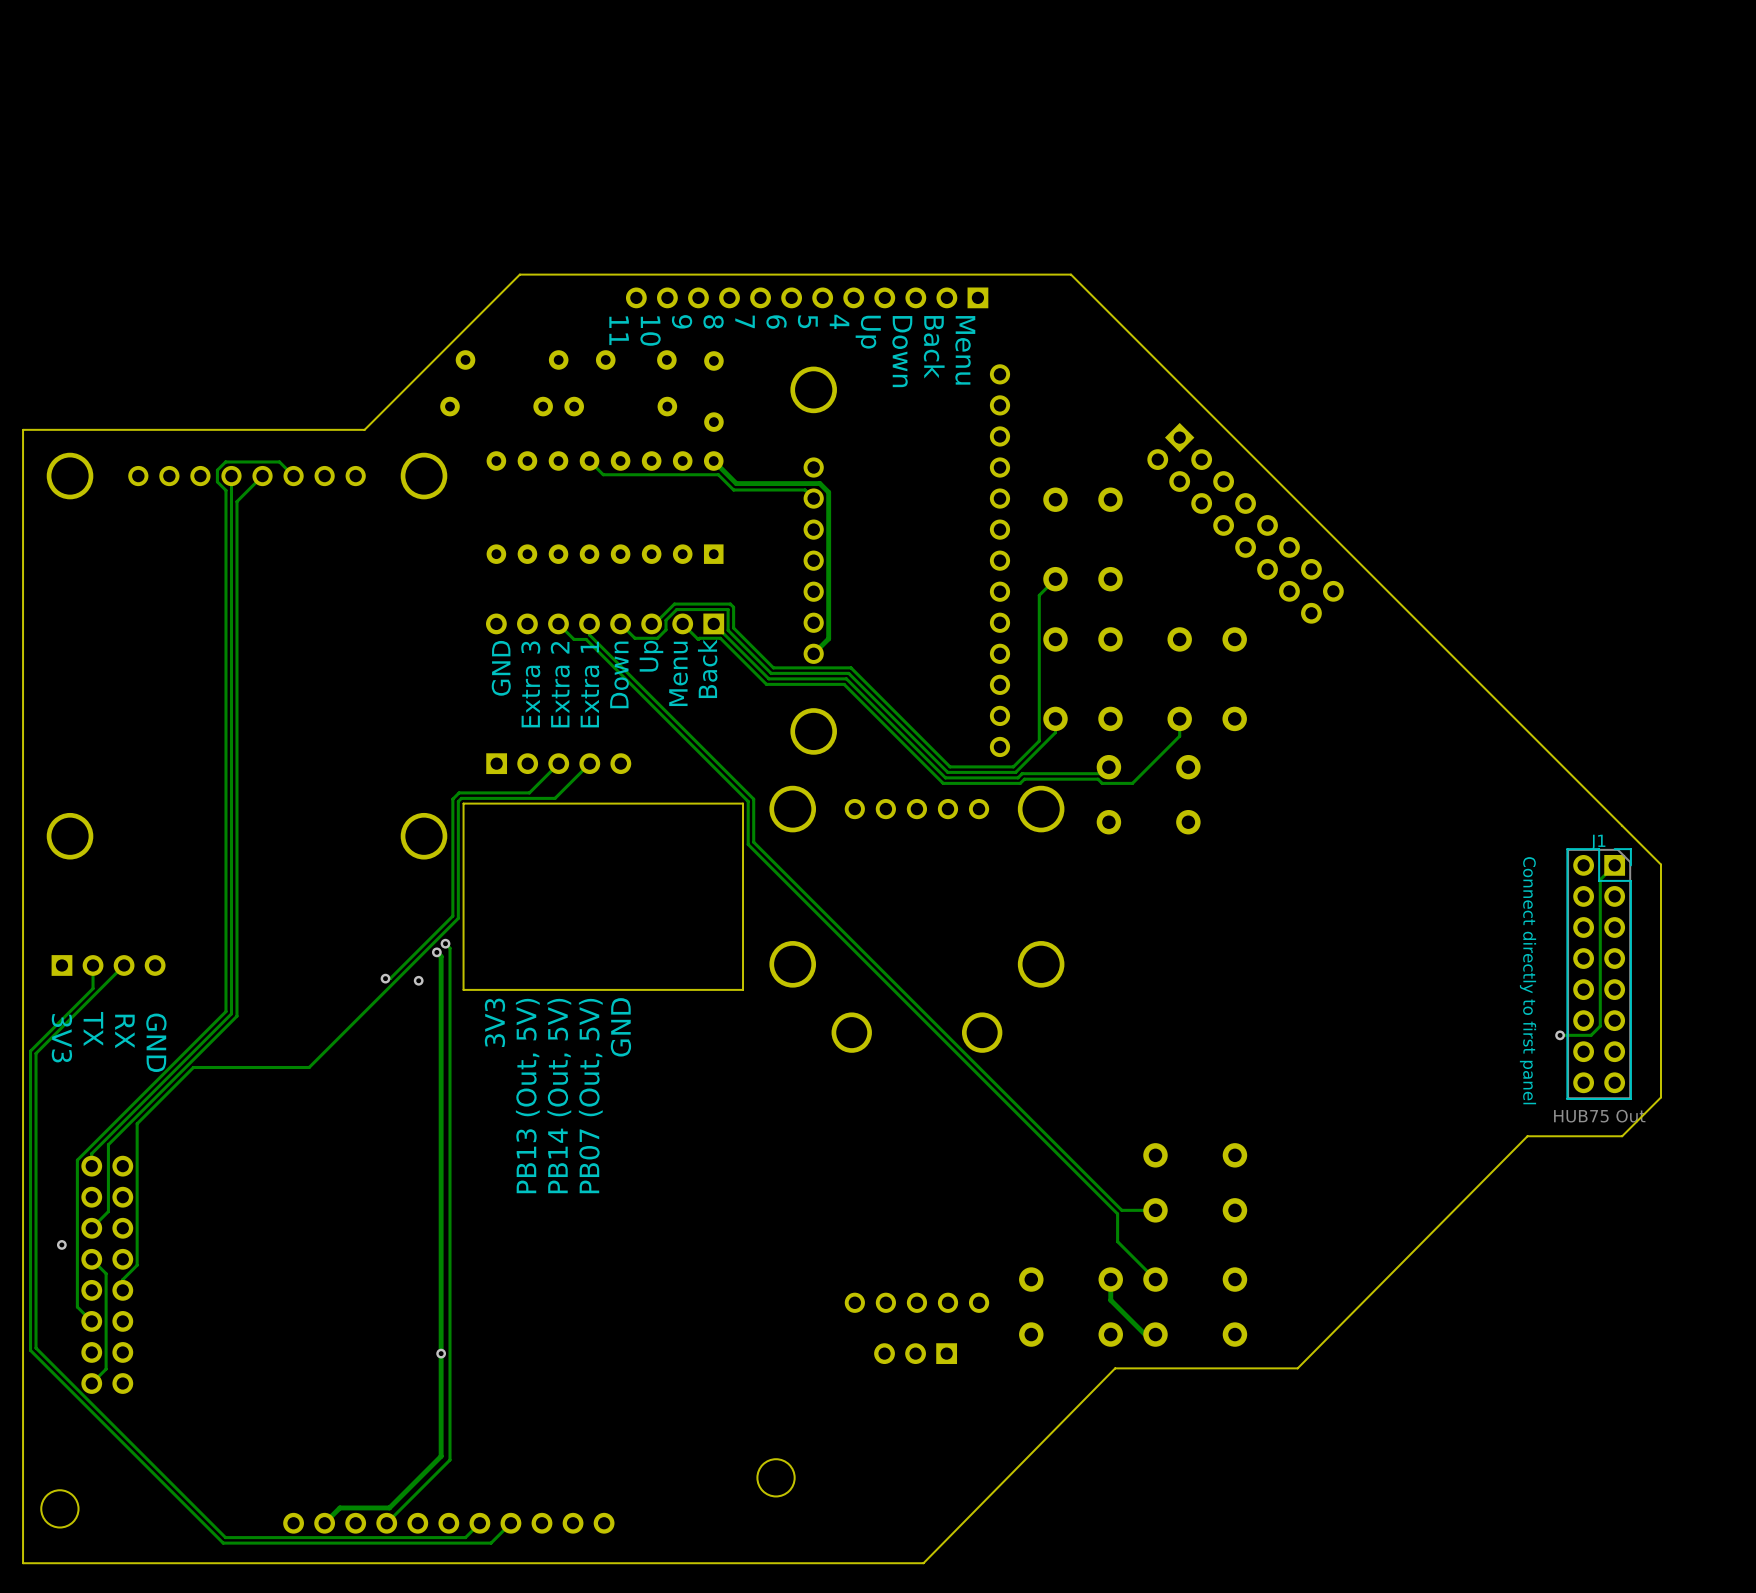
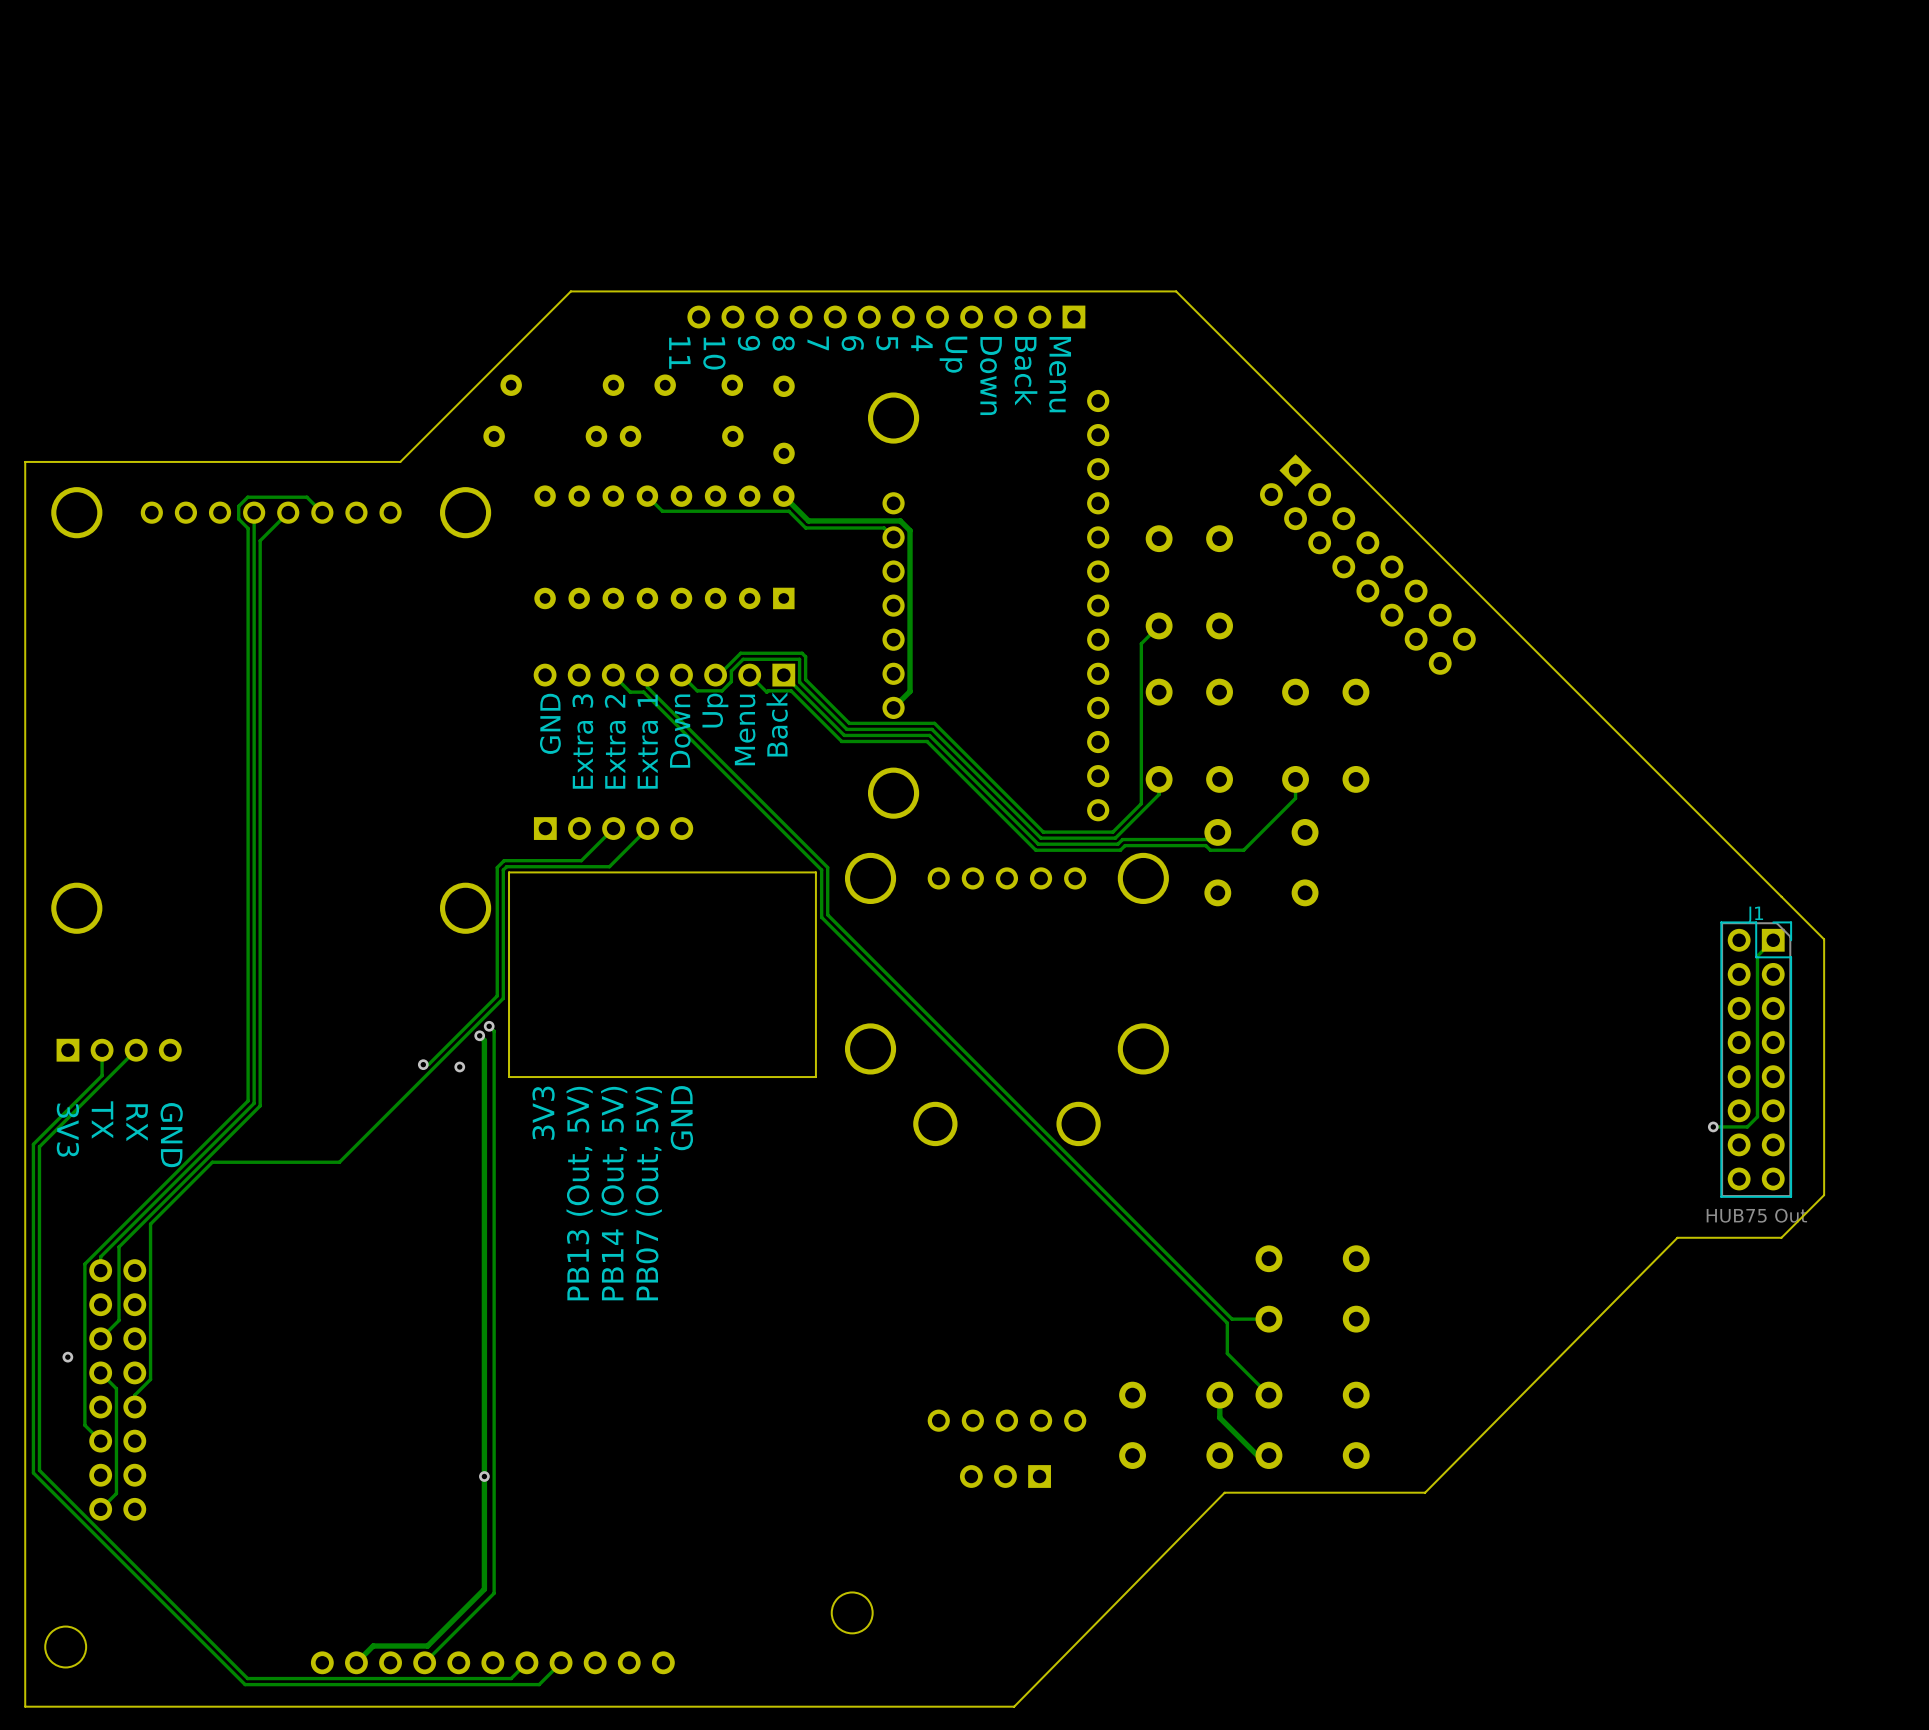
text: Connect directly to first panel (1527, 980) -> none

